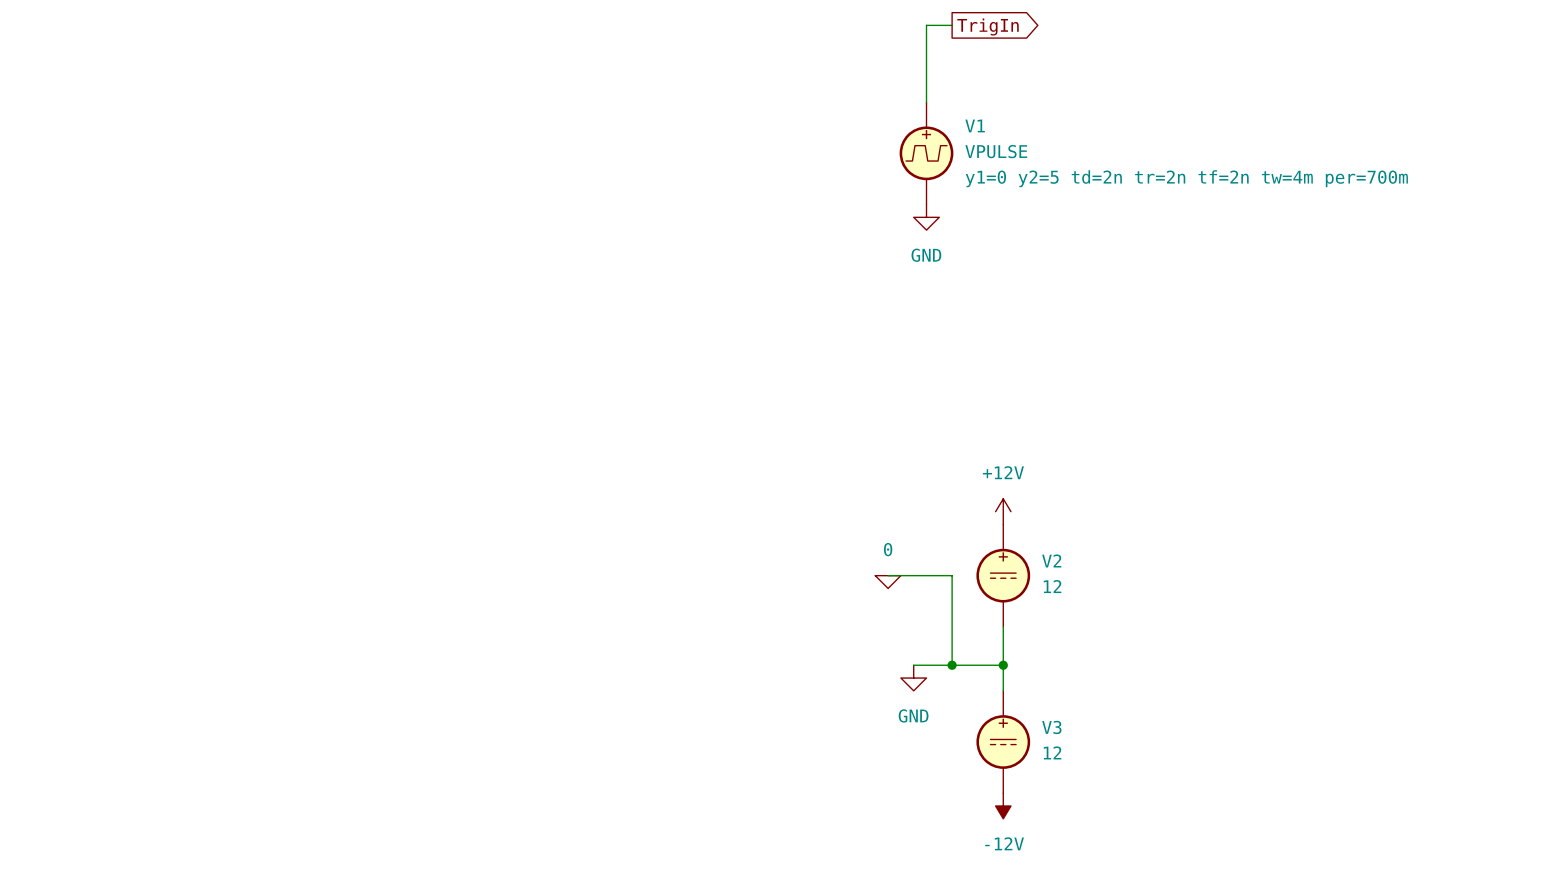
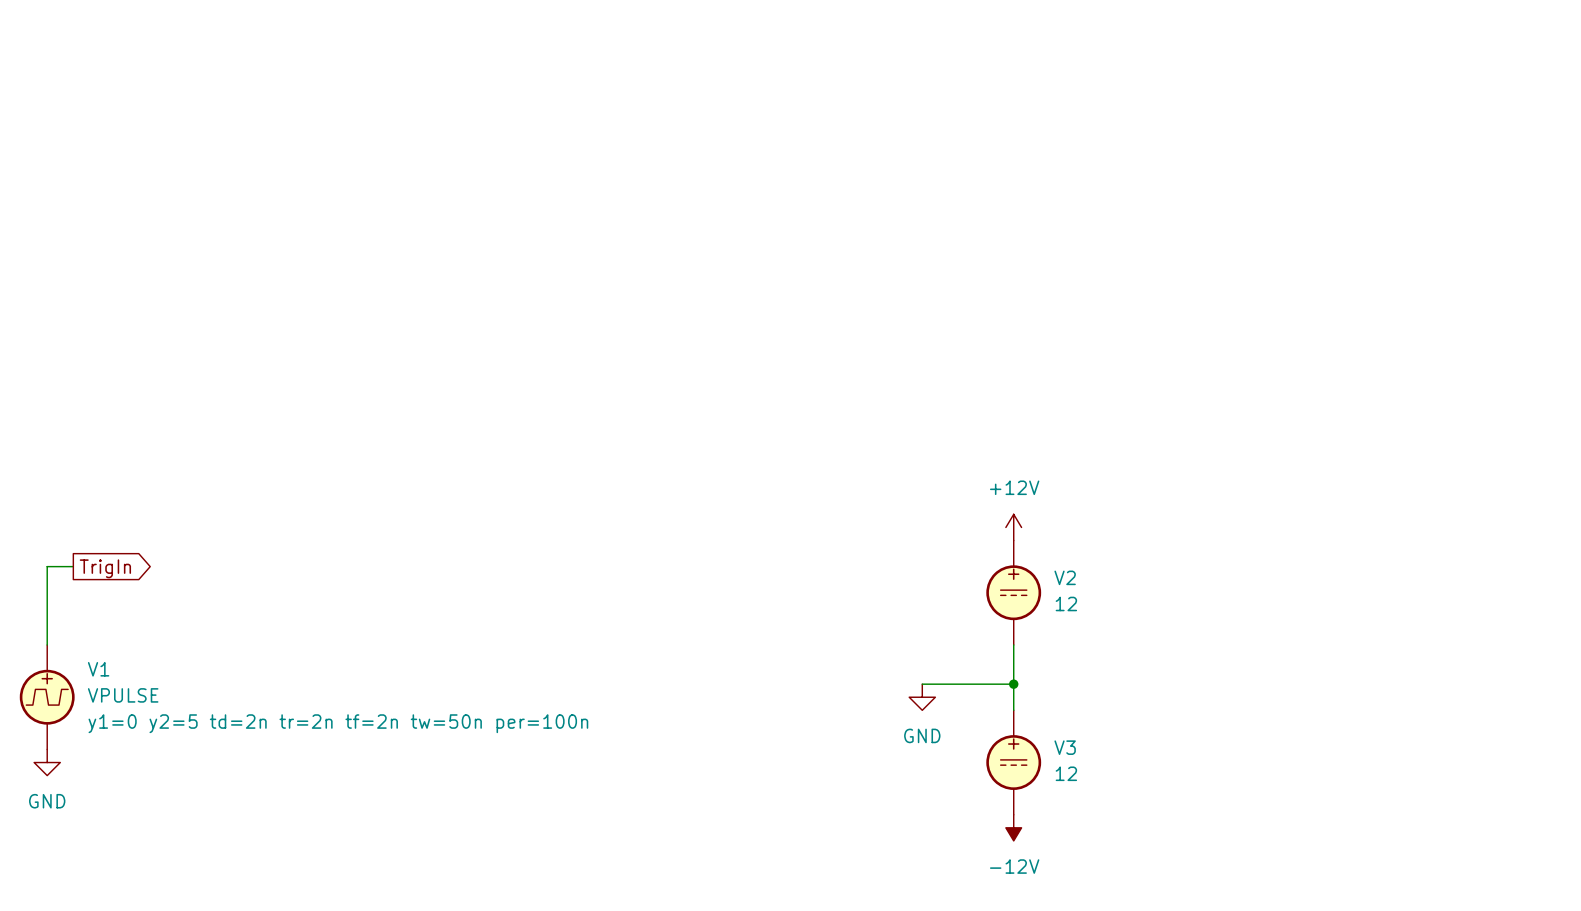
wire: (952, 25) (926, 25) (926, 102) -> none
global label: TrigIn (988, 26) -> none
V1 position: (926, 153) -> (47, 697)
V1 text: y1=0 y2=5 td=2n tr=2n tf=2n tw=4m per=700m (1186, 178) -> y1=0 y2=5 td=2n tr=2n tf=2n tw=50n per=100n (338, 723)
power symbol: GND (926, 217) -> none
wire: none -> (73, 566) (47, 566) (47, 644)
global label: none -> TrigIn (105, 568)
wire: (888, 575) (952, 575) (952, 665) -> none
power symbol: 0 (888, 582) -> none
junction: (952, 665) -> none
power symbol: none -> GND (47, 762)

